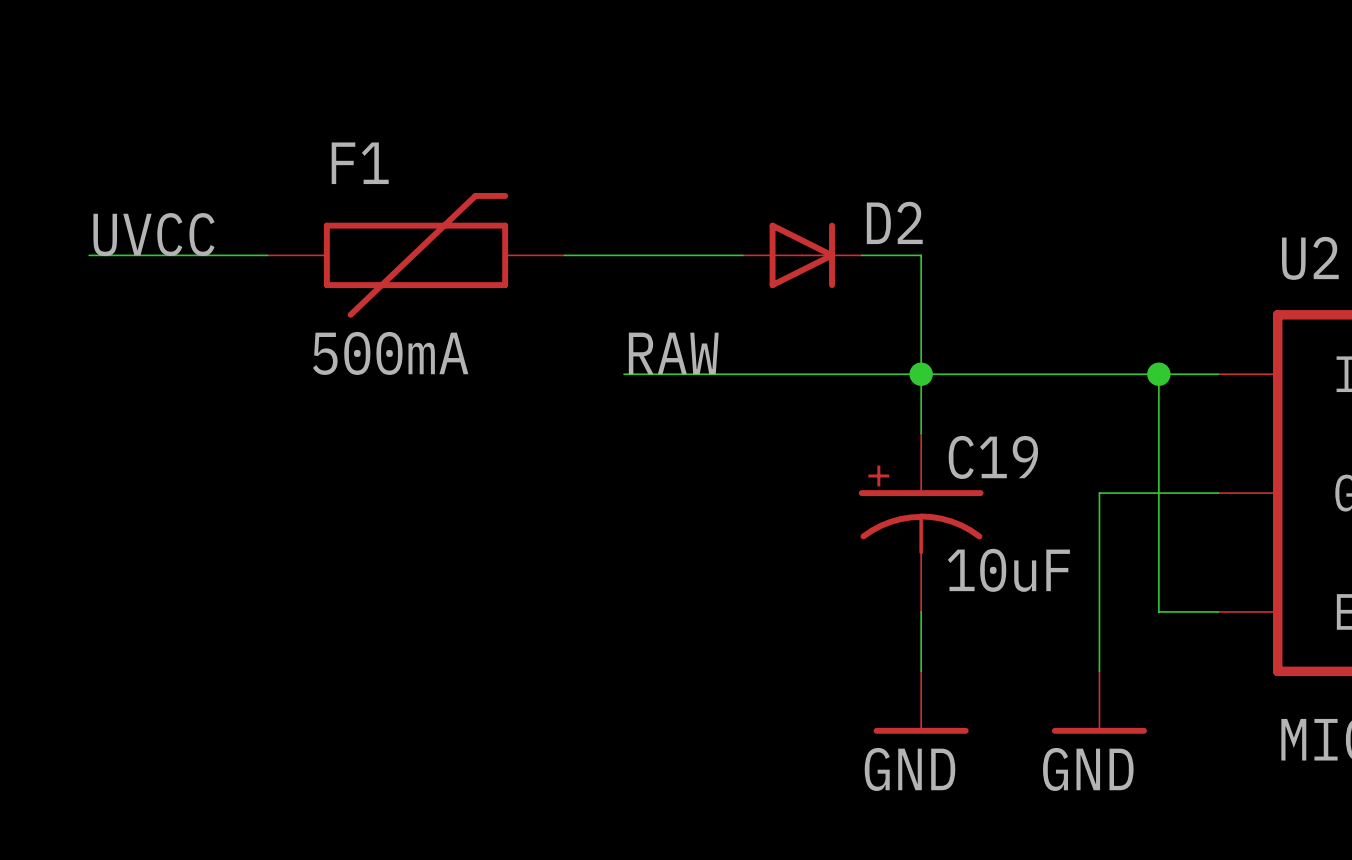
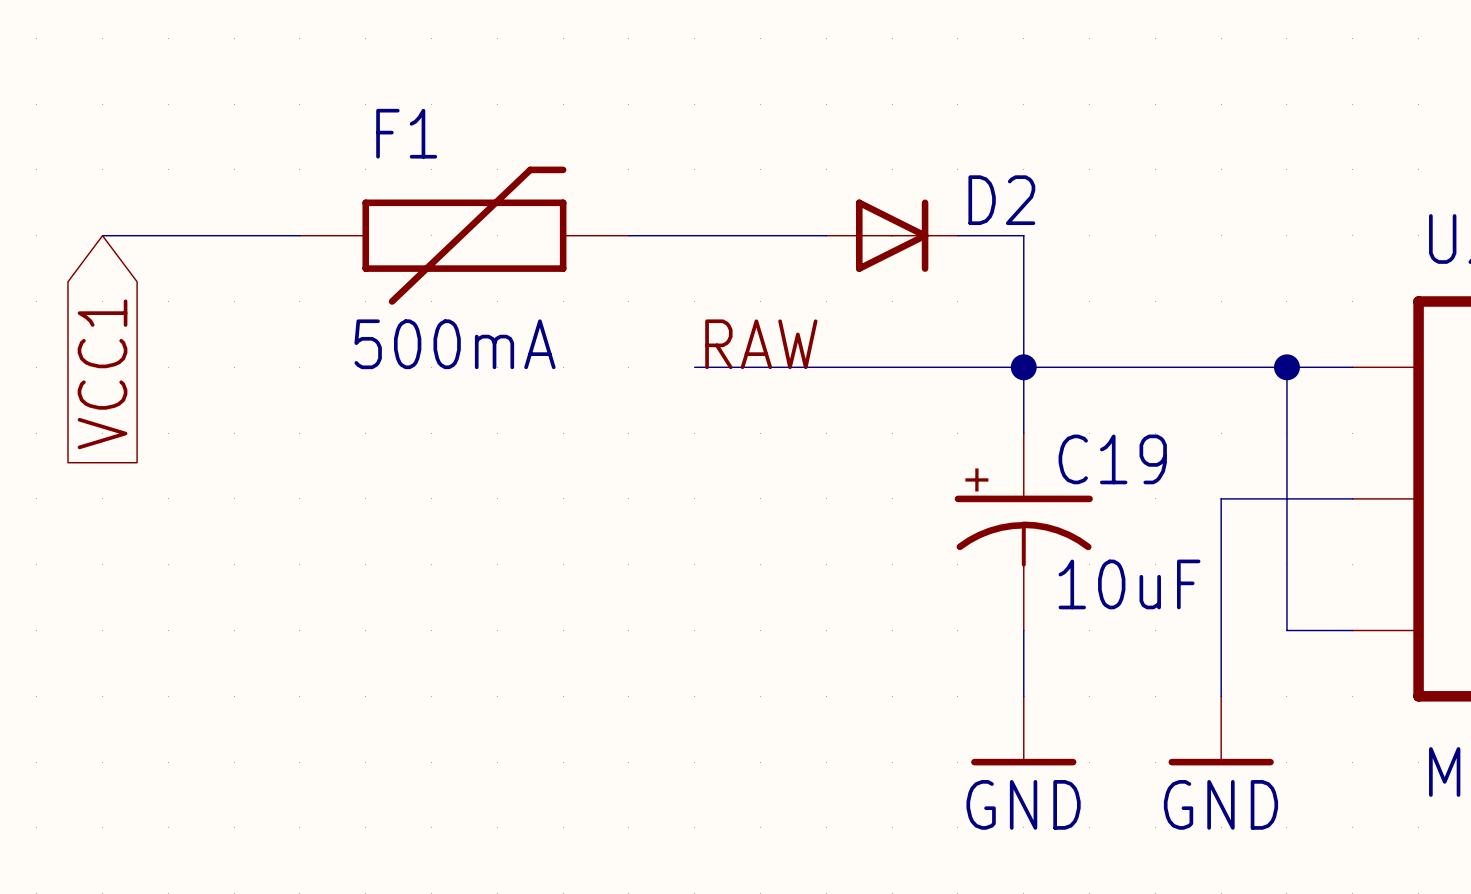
label: UVCC (154, 234) -> none
global label: none -> VCC1 (102, 374)

